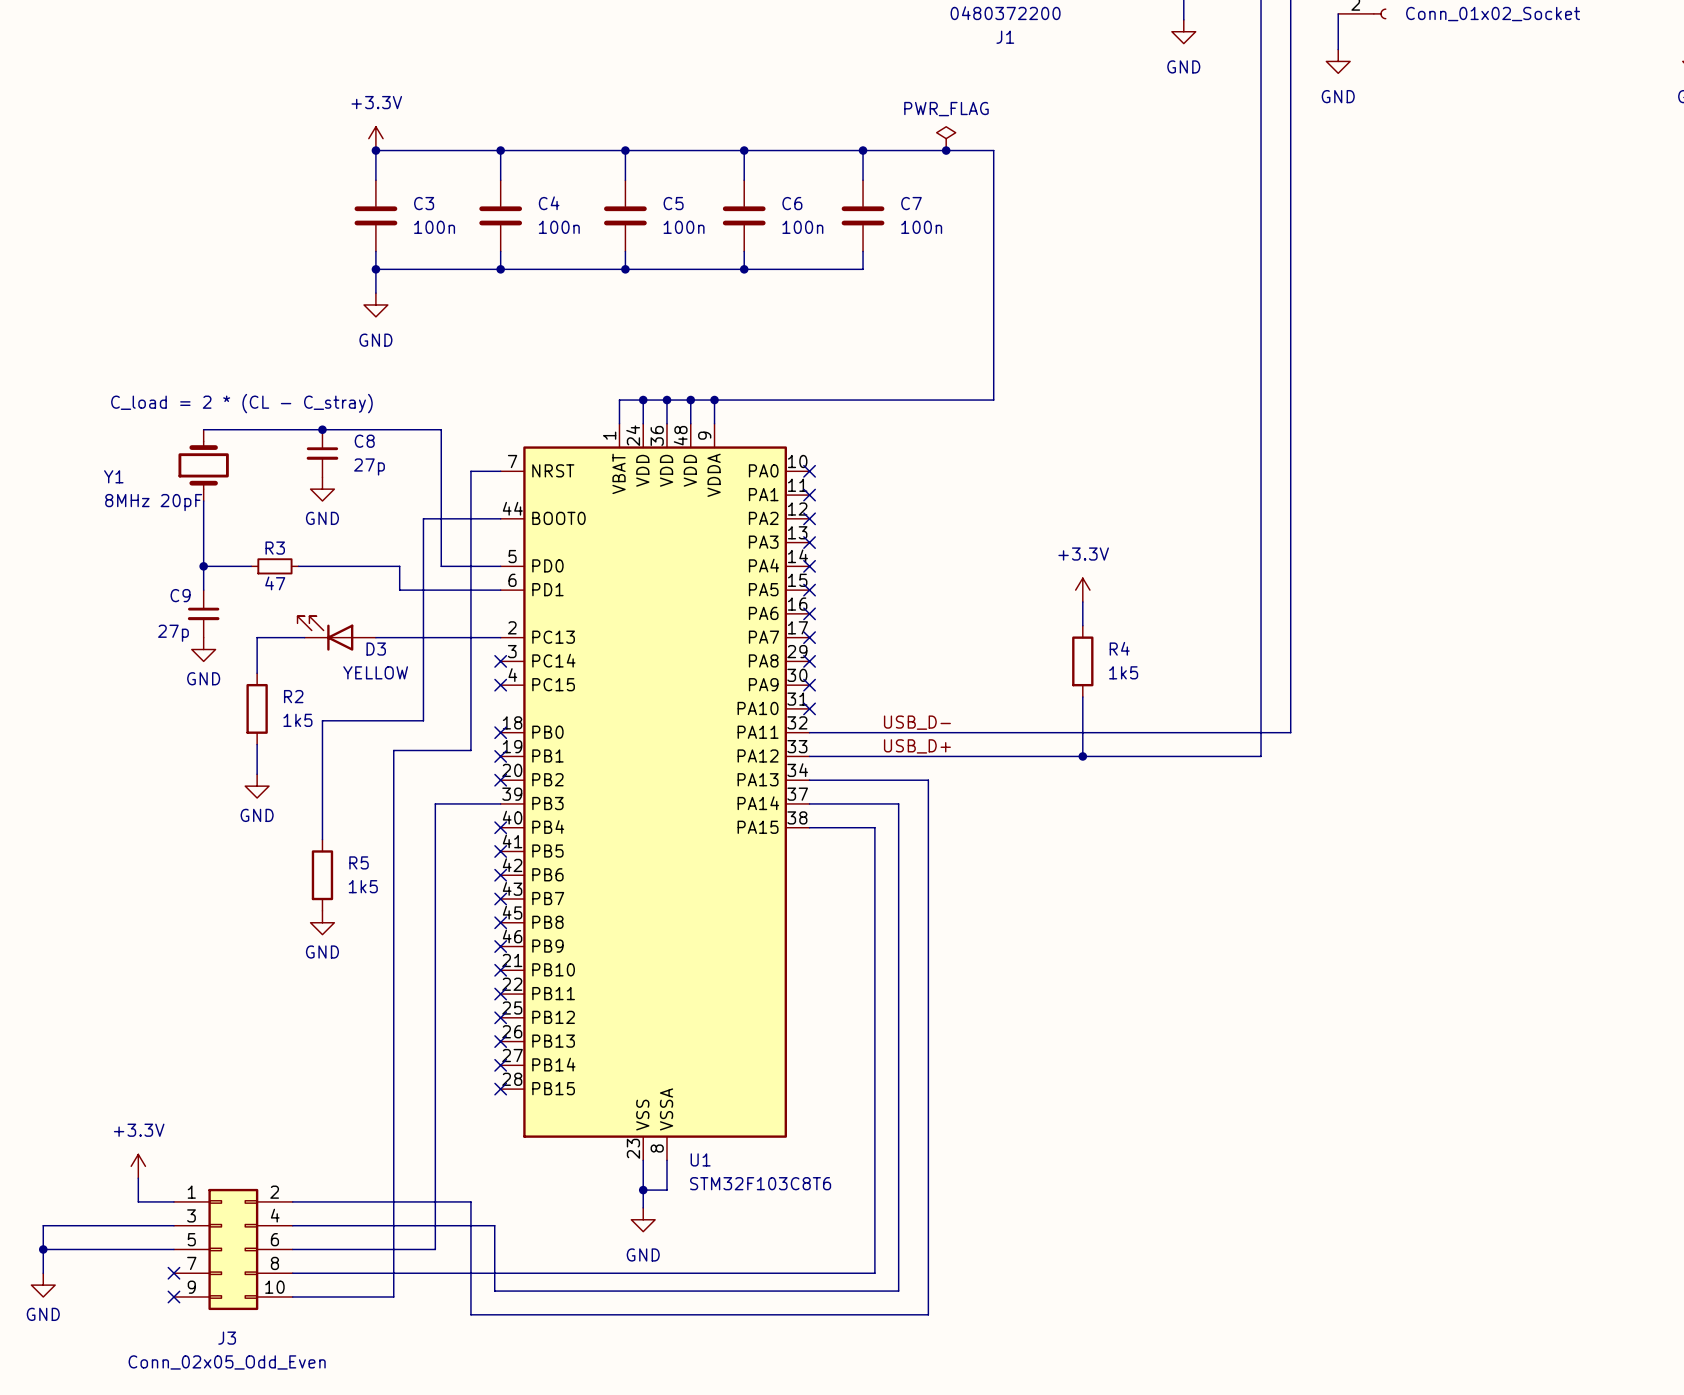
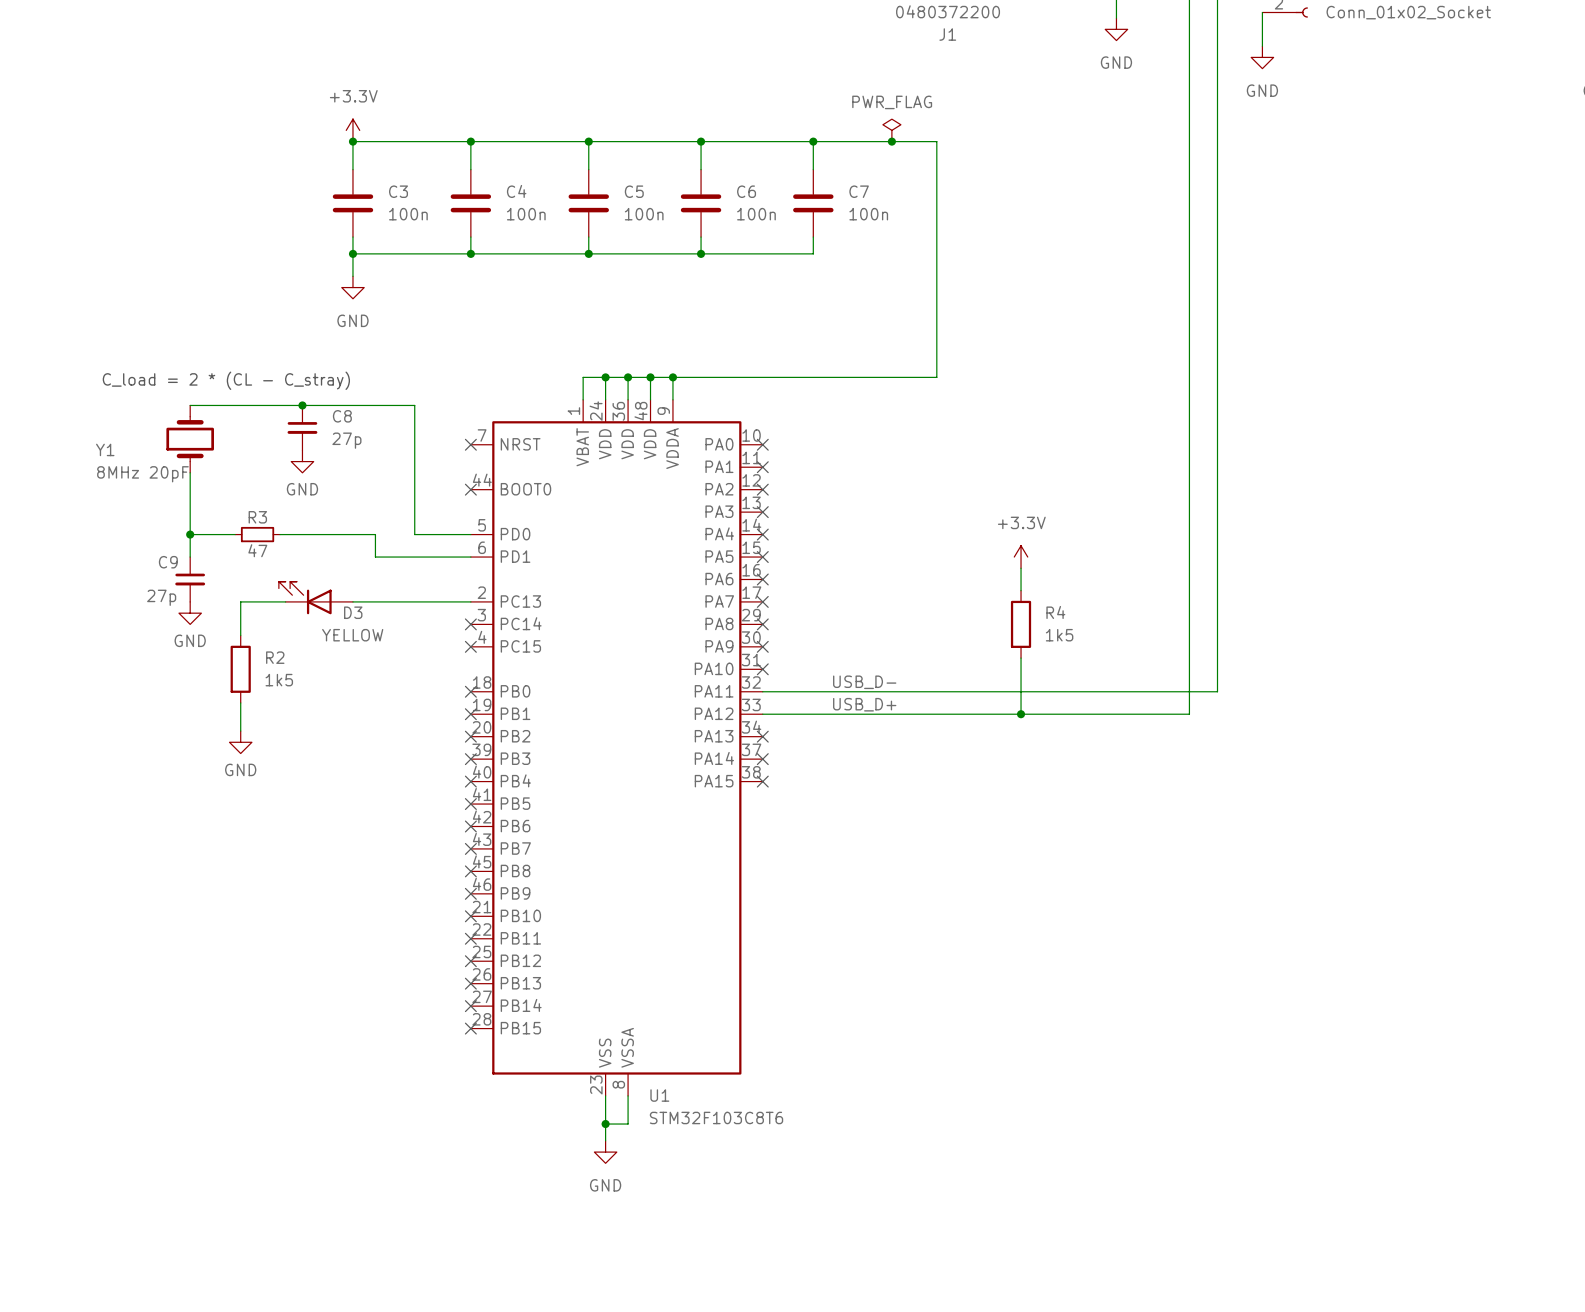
wire: (500, 471) (470, 471) (470, 750) (393, 750) (393, 1297) (292, 1297) -> none
no-connect mark: none -> (470, 444)
wire: (500, 518) (423, 518) (423, 720) (322, 720) (322, 839) -> none
no-connect mark: none -> (470, 489)
wire: (809, 780) (928, 780) (928, 1314) (470, 1314) (470, 1201) (292, 1201) -> none
no-connect mark: none -> (762, 736)
wire: (500, 803) (435, 803) (435, 1249) (292, 1249) -> none
no-connect mark: none -> (470, 759)
wire: (809, 803) (898, 803) (898, 1291) (494, 1291) (494, 1225) (292, 1225) -> none
no-connect mark: none -> (762, 759)
wire: (809, 827) (874, 827) (874, 1273) (292, 1273) -> none
no-connect mark: none -> (762, 781)
R5: 1k5 (322, 875) -> none
power symbol: GND (322, 922) -> none
power symbol: +3.3V (138, 1166) -> none
wire: (138, 1178) (138, 1201) (173, 1201) -> none
wire: (173, 1225) (43, 1225) (43, 1273) -> none
wire: (43, 1249) (173, 1249) -> none
junction: (43, 1249) -> none
J3: Conn_02x05_Odd_Even (233, 1249) -> none
no-connect mark: (173, 1273) -> none
power symbol: GND (43, 1285) -> none
no-connect mark: (173, 1297) -> none

